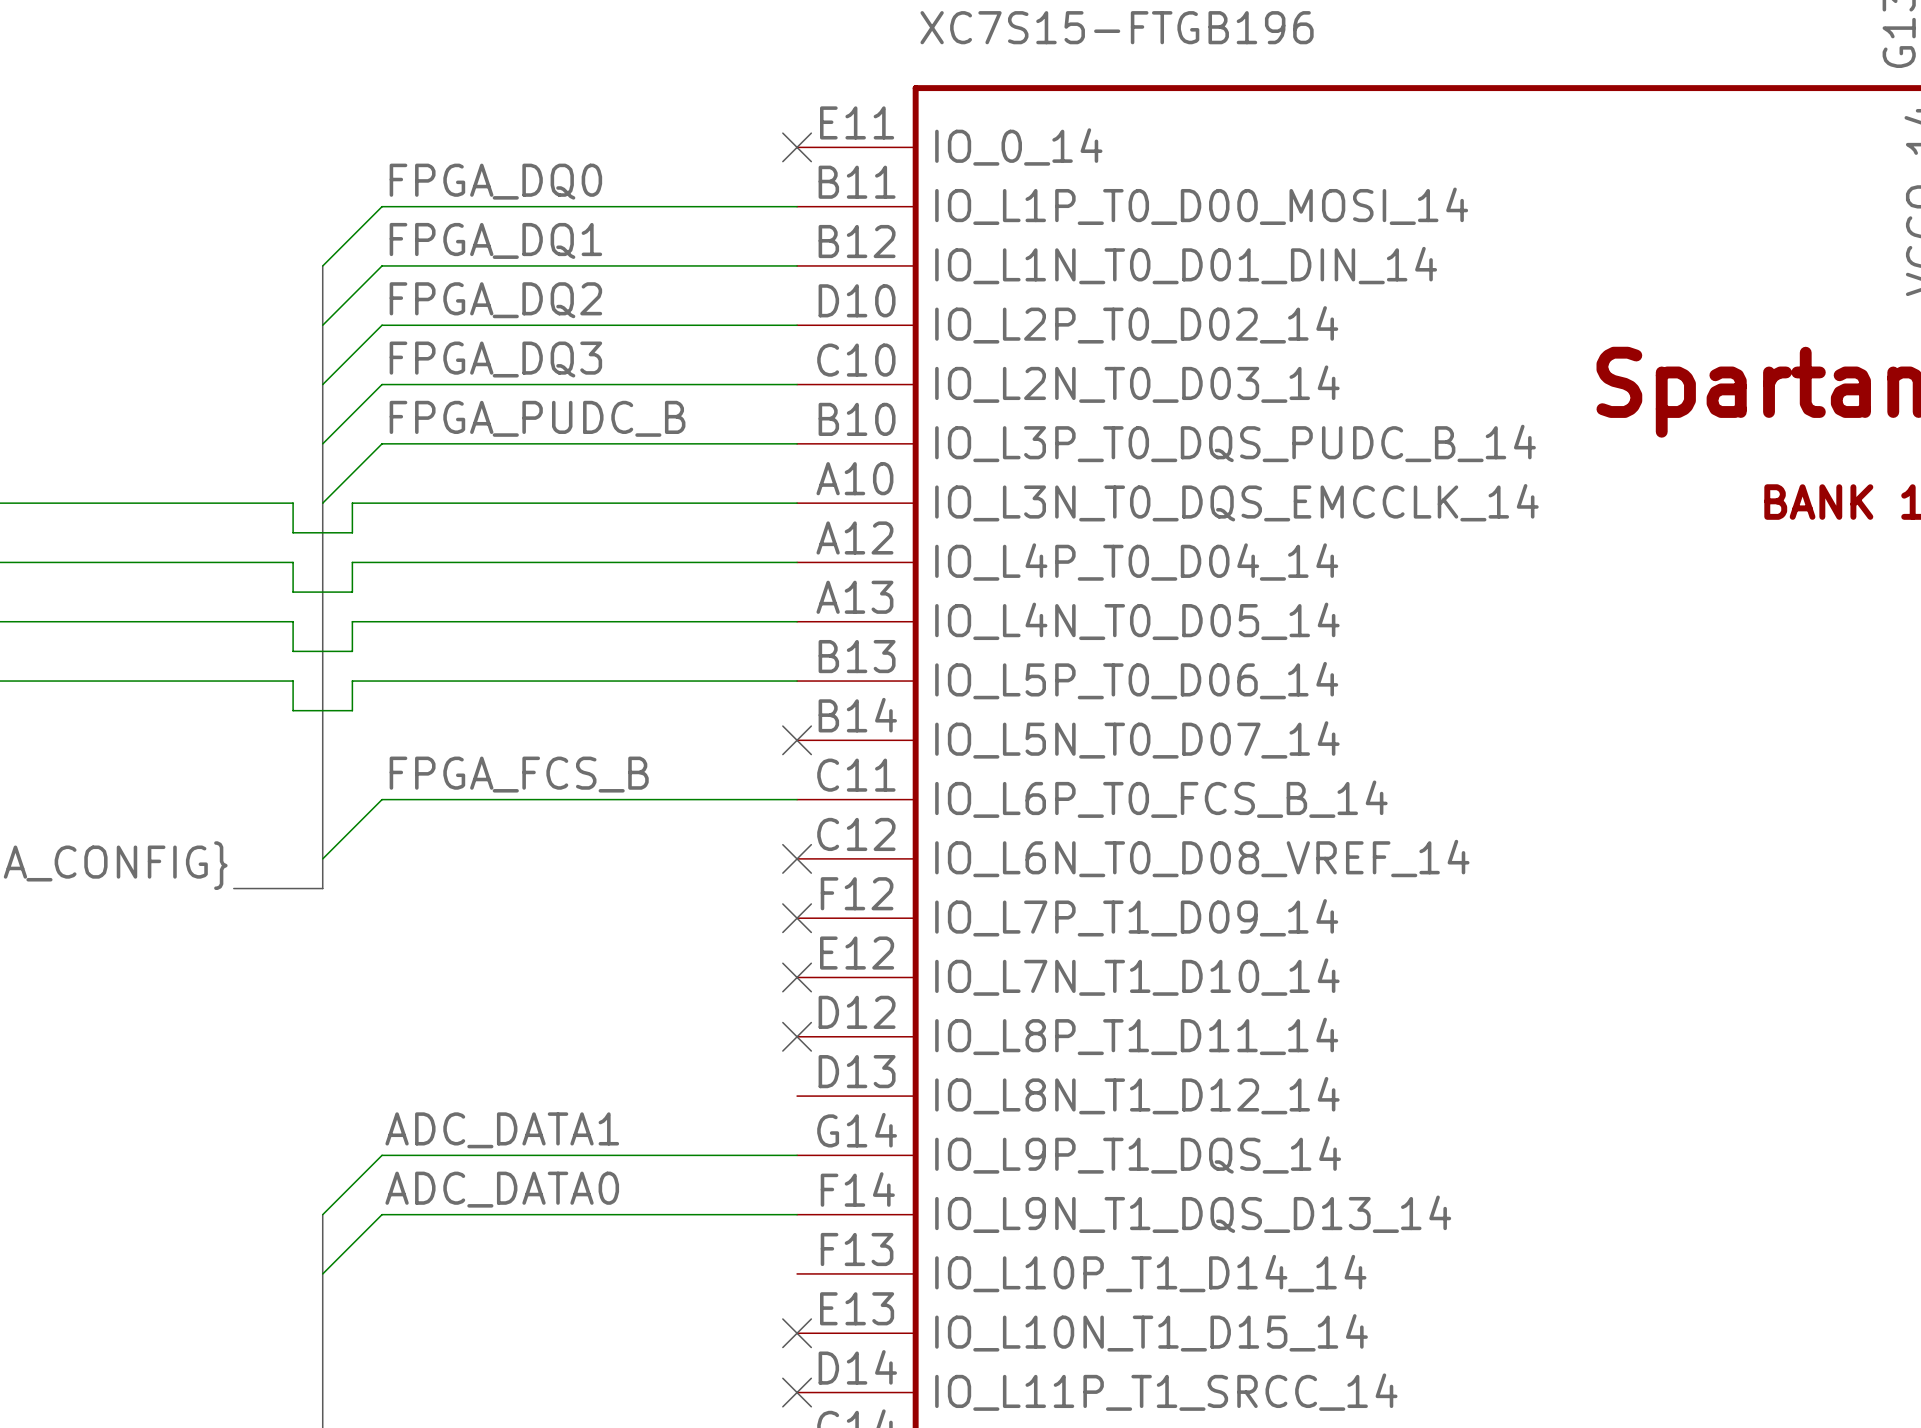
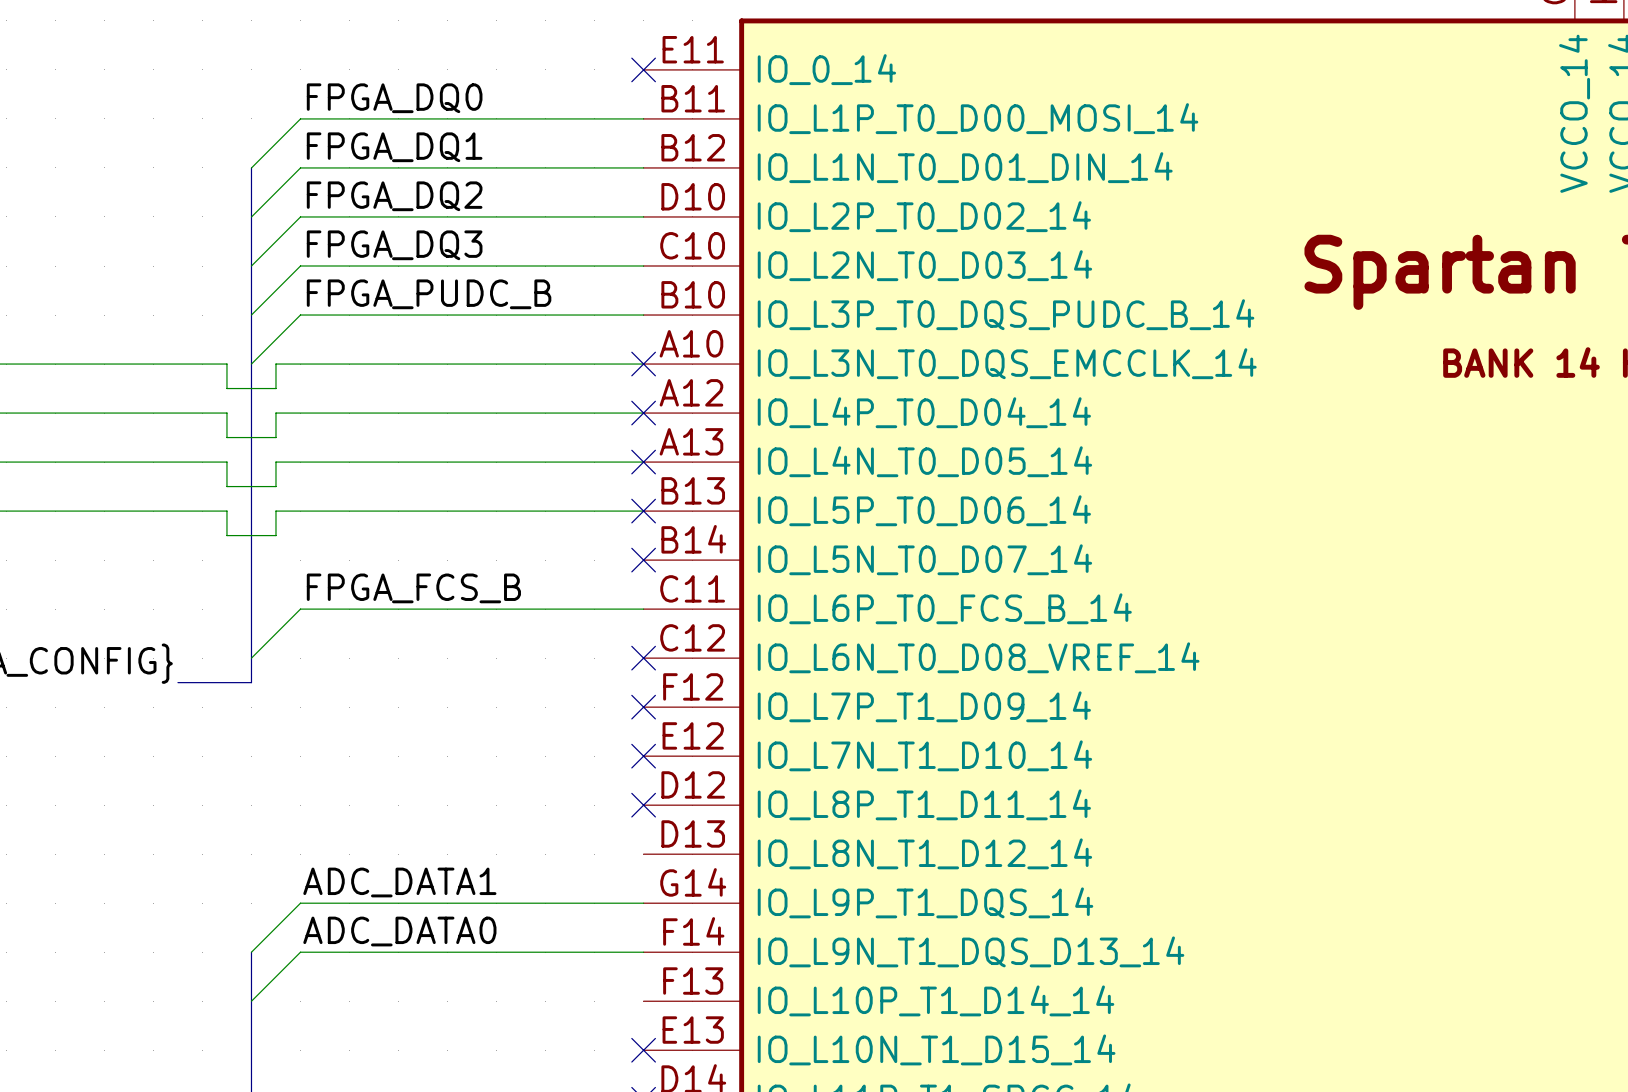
no-connect mark: none -> (643, 364)
no-connect mark: none -> (643, 413)
no-connect mark: none -> (643, 462)
no-connect mark: none -> (643, 511)

